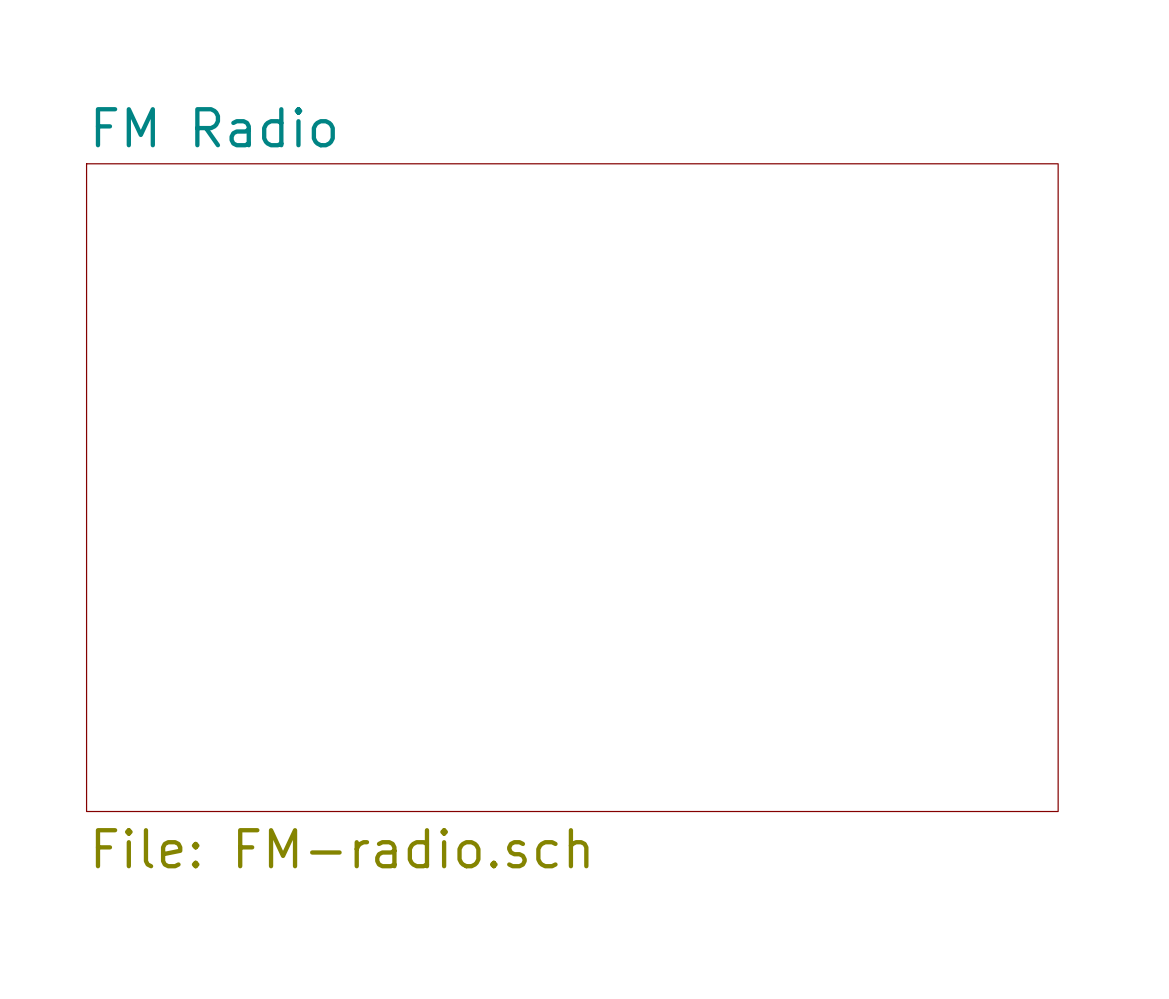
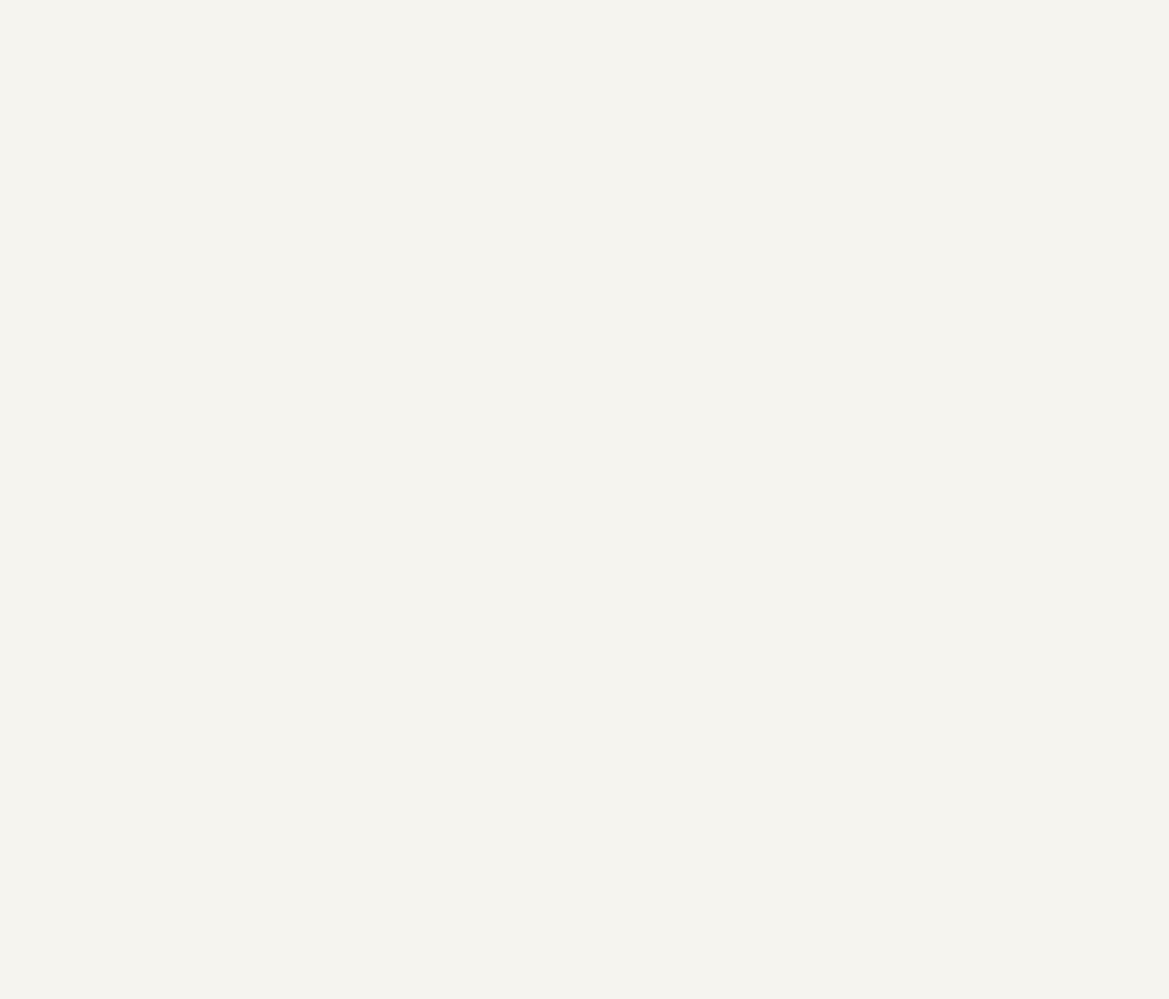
sheet FM Radio: File: FM-radio.sch (572, 487) -> none

